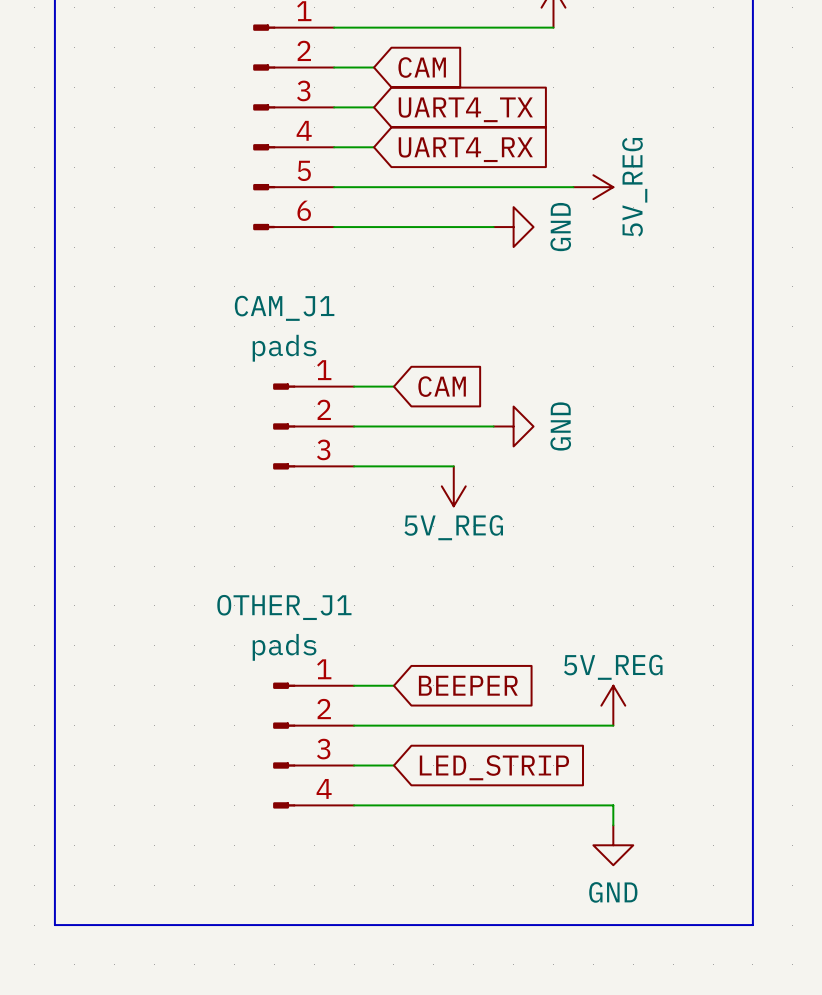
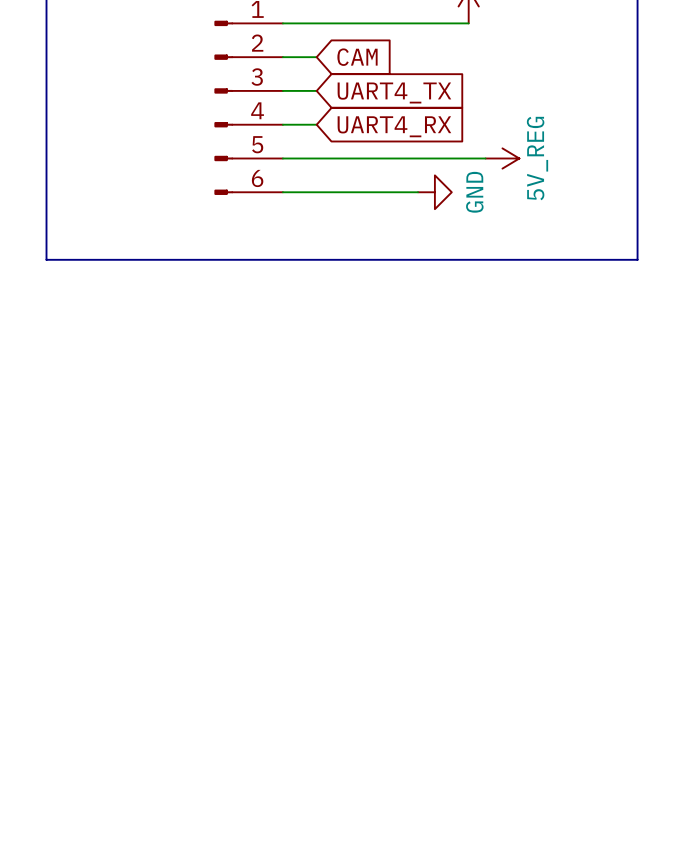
line: (54, 306) (54, 925) (752, 925) (752, 306) -> (46, 259) (637, 259)
wire: (354, 386) (393, 386) -> none
global label: CAM (442, 386) -> none
CAM_J1: pads (313, 426) -> none
wire: (354, 426) (493, 426) -> none
power symbol: GND (513, 426) -> none
wire: (354, 466) (453, 466) -> none
power symbol: 5V_REG (453, 486) -> none
wire: (354, 685) (393, 685) -> none
global label: BEEPER (468, 685) -> none
power symbol: 5V_REG (613, 705) -> none
wire: (354, 725) (613, 725) -> none
OTHER_J1: pads (313, 745) -> none
wire: (354, 765) (393, 765) -> none
global label: LED_STRIP (494, 767) -> none
wire: (354, 805) (613, 805) (613, 825) -> none
power symbol: GND (613, 845) -> none

